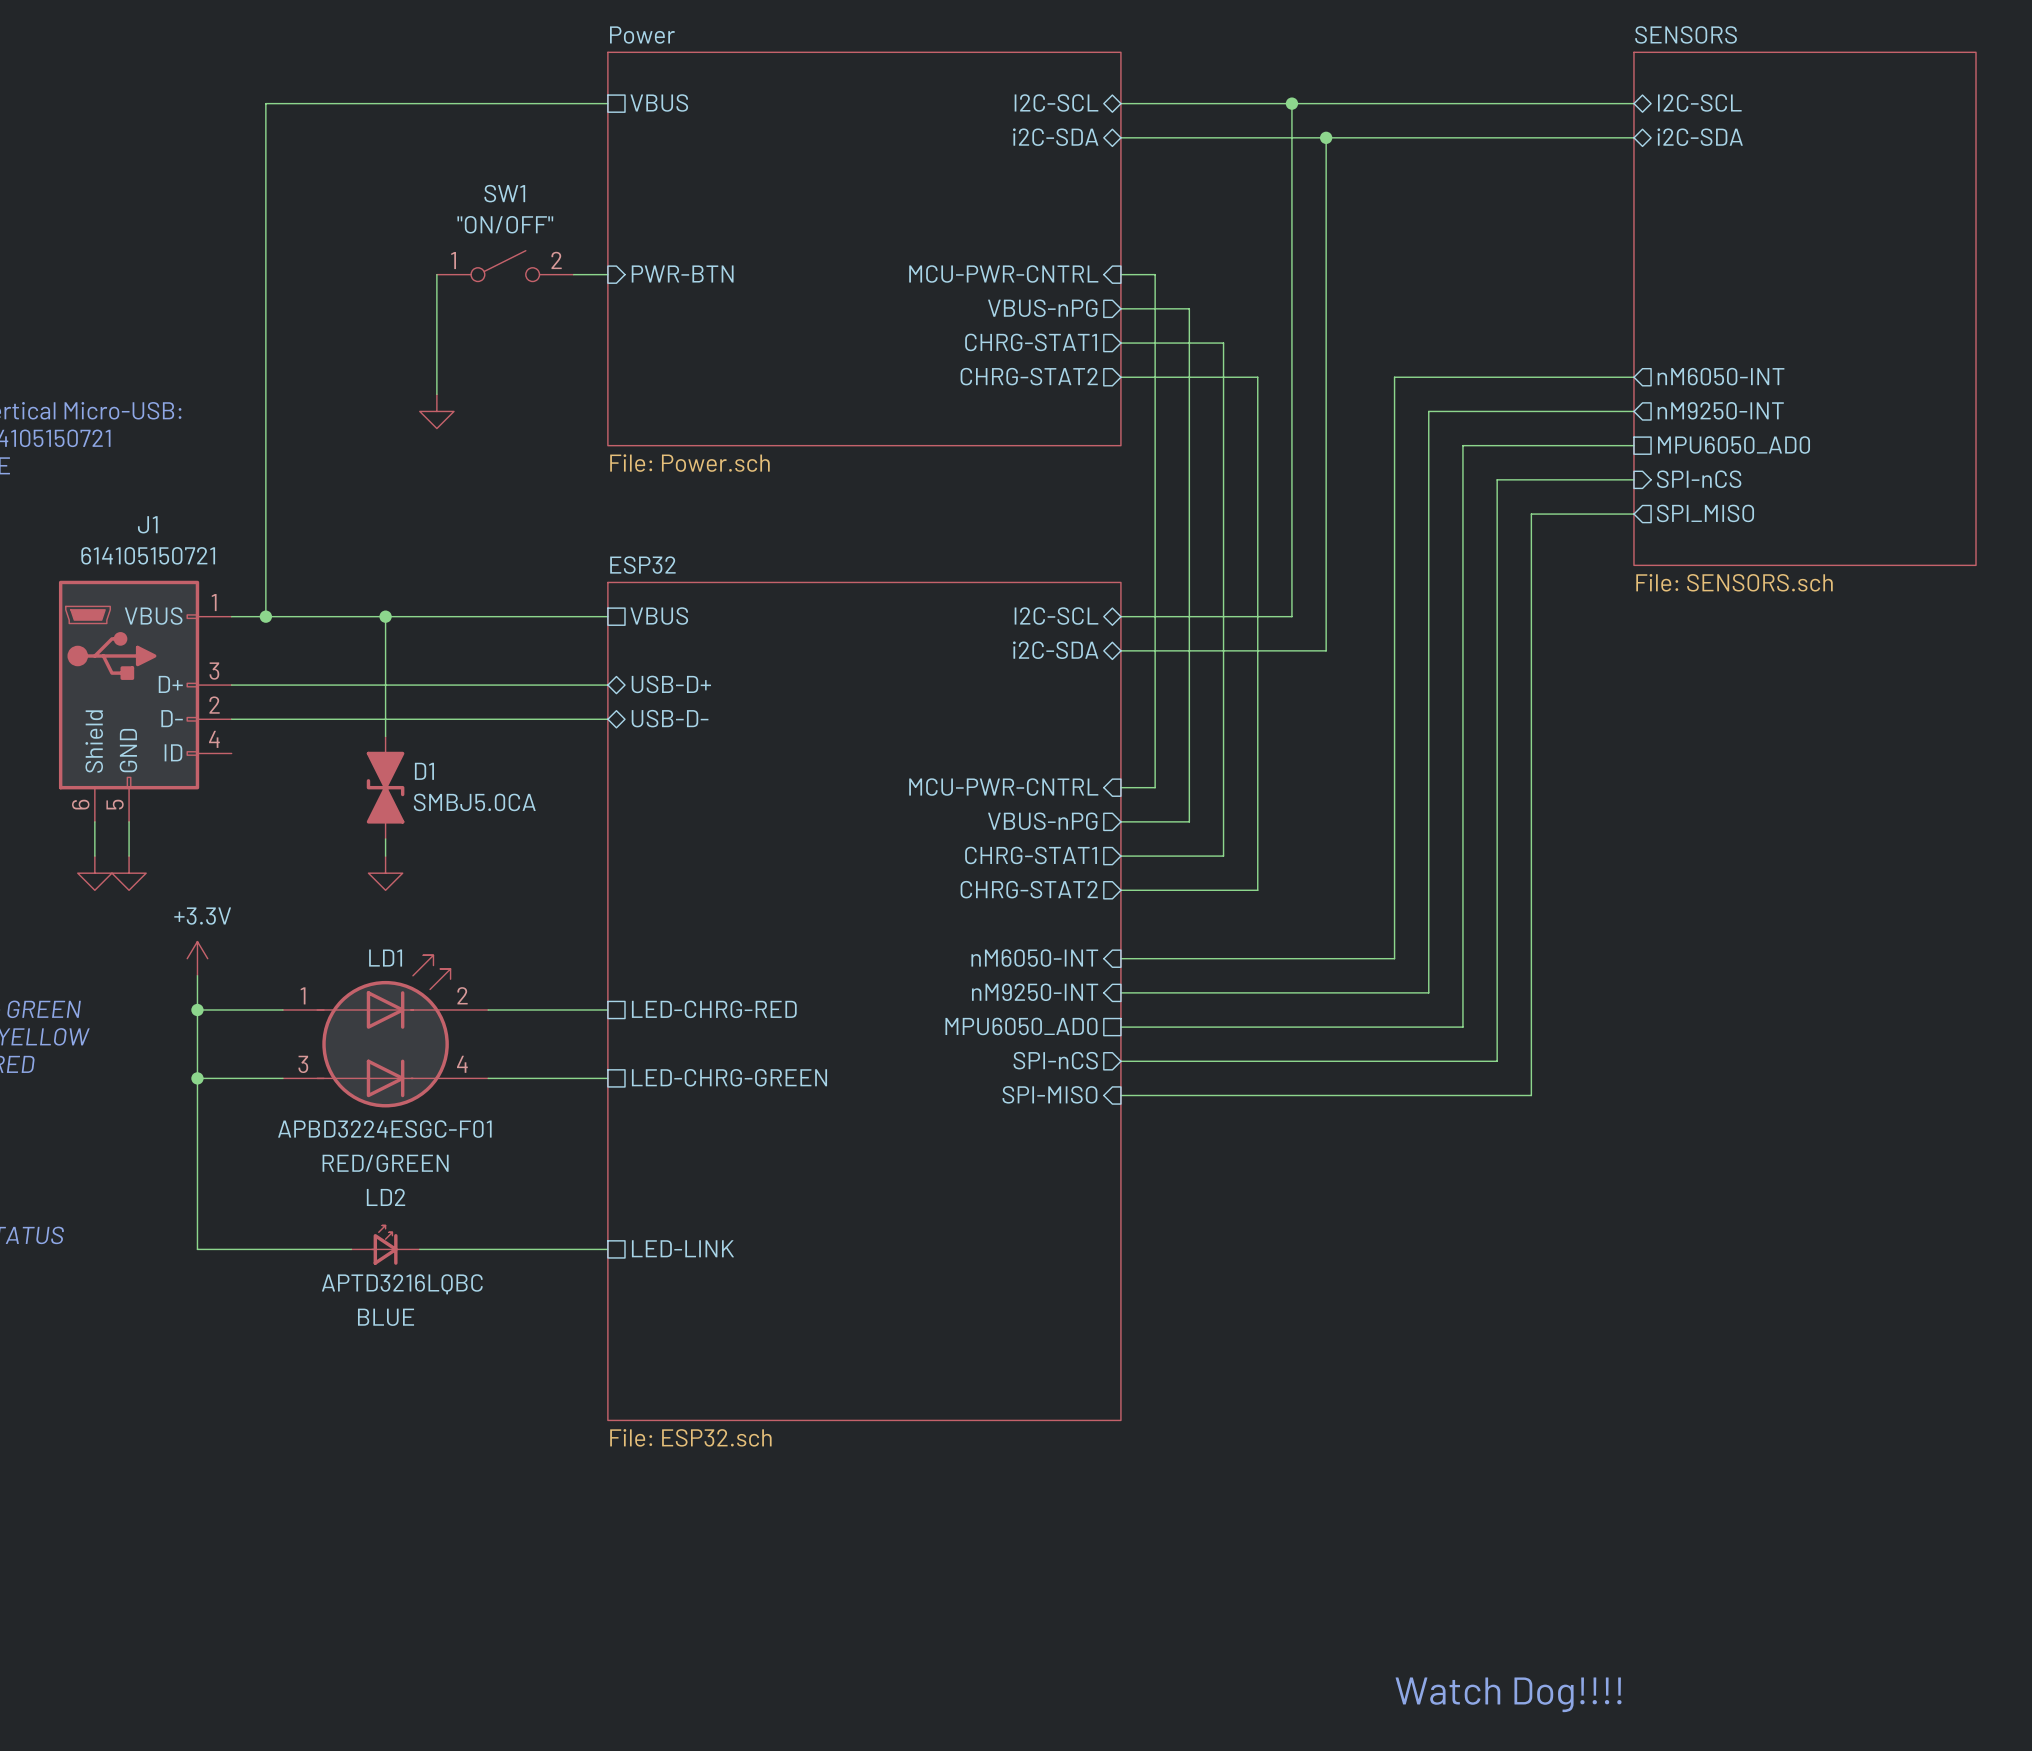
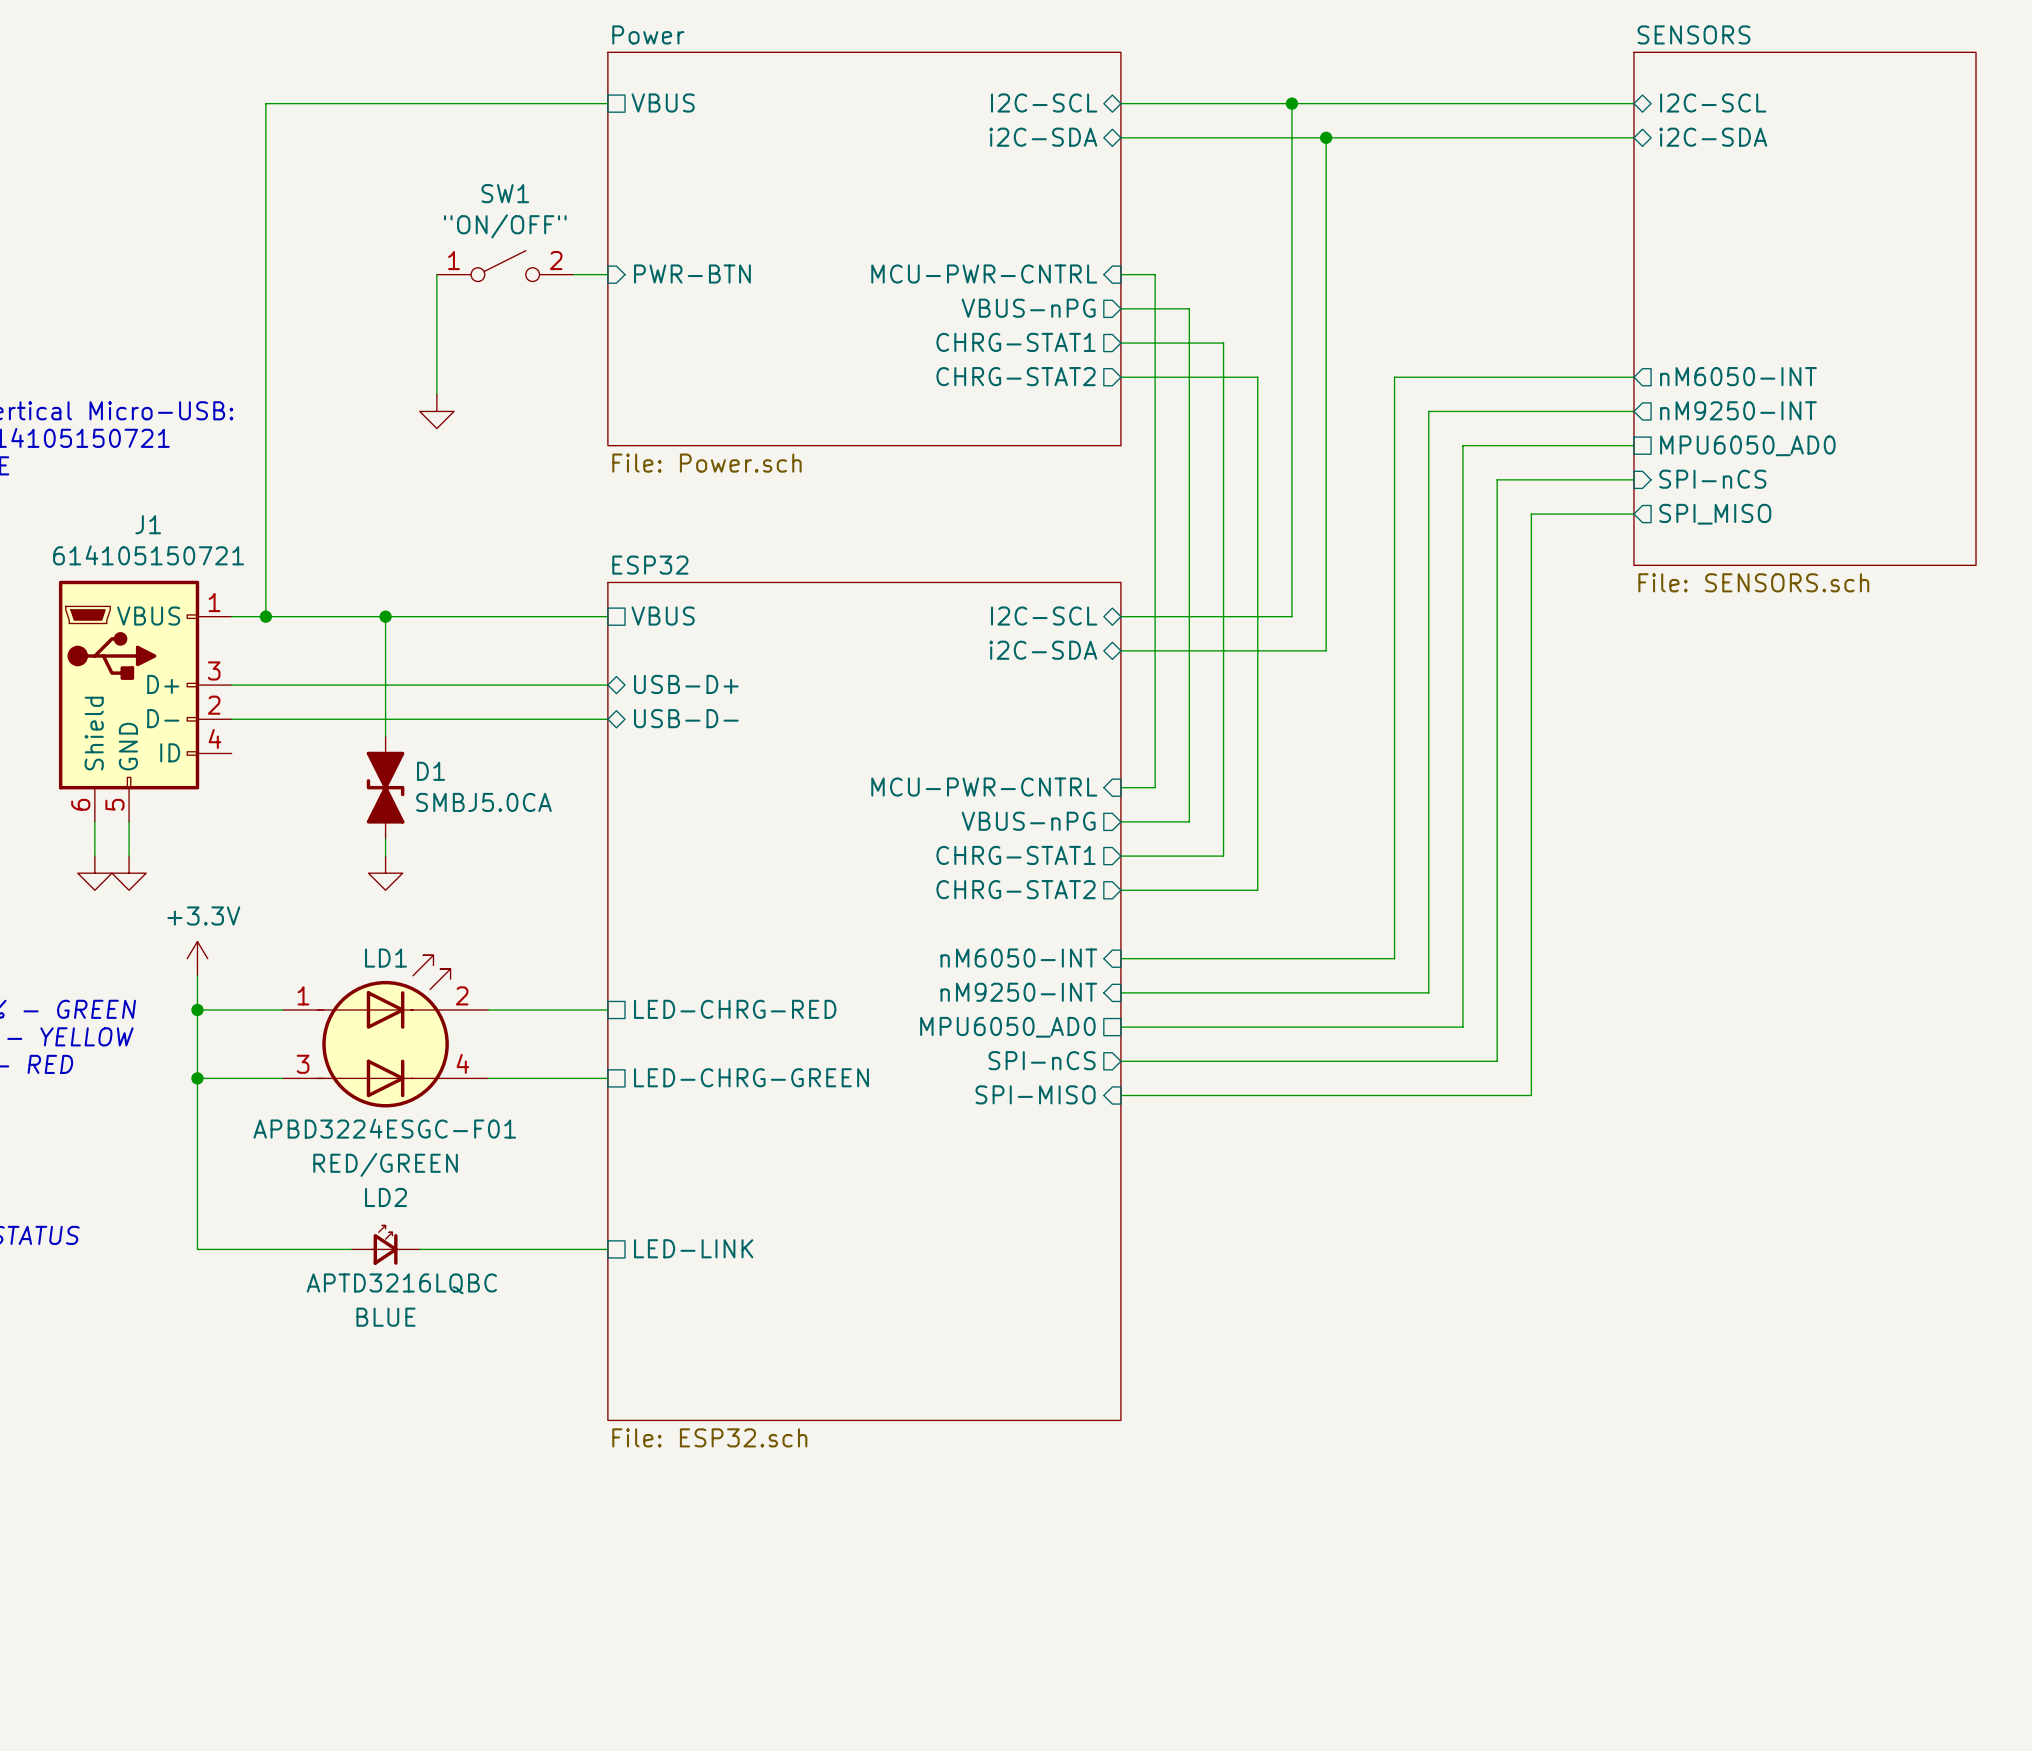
text: Watch Dog!!!! (1508, 1694) -> none

